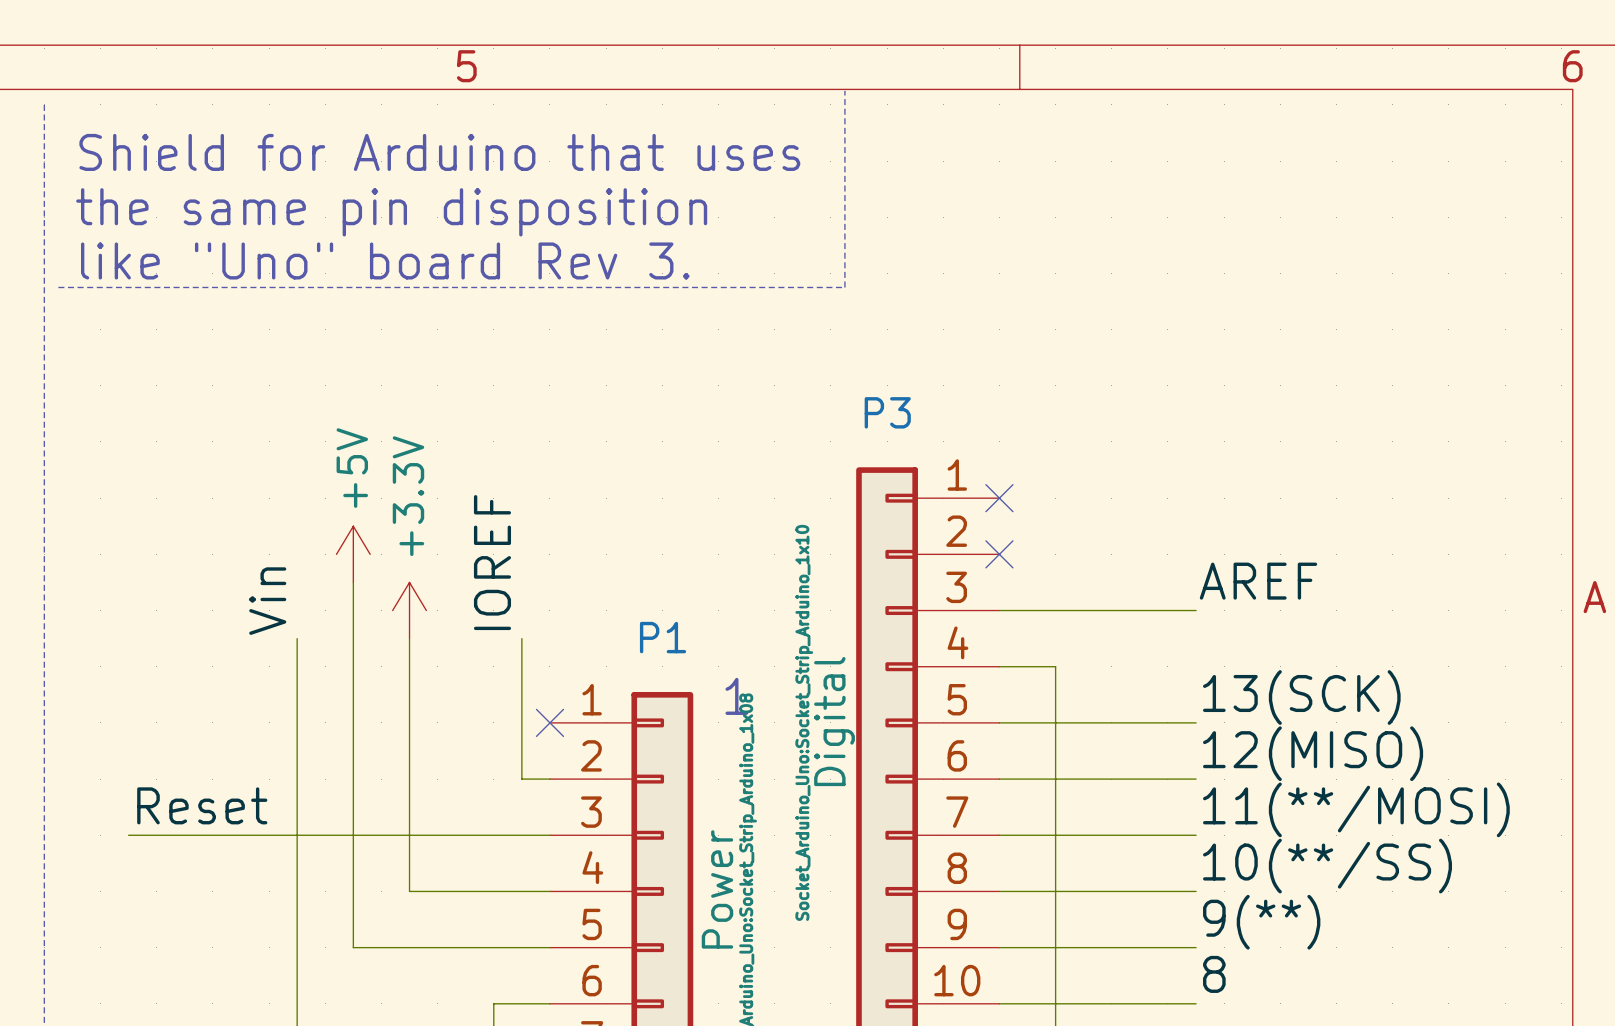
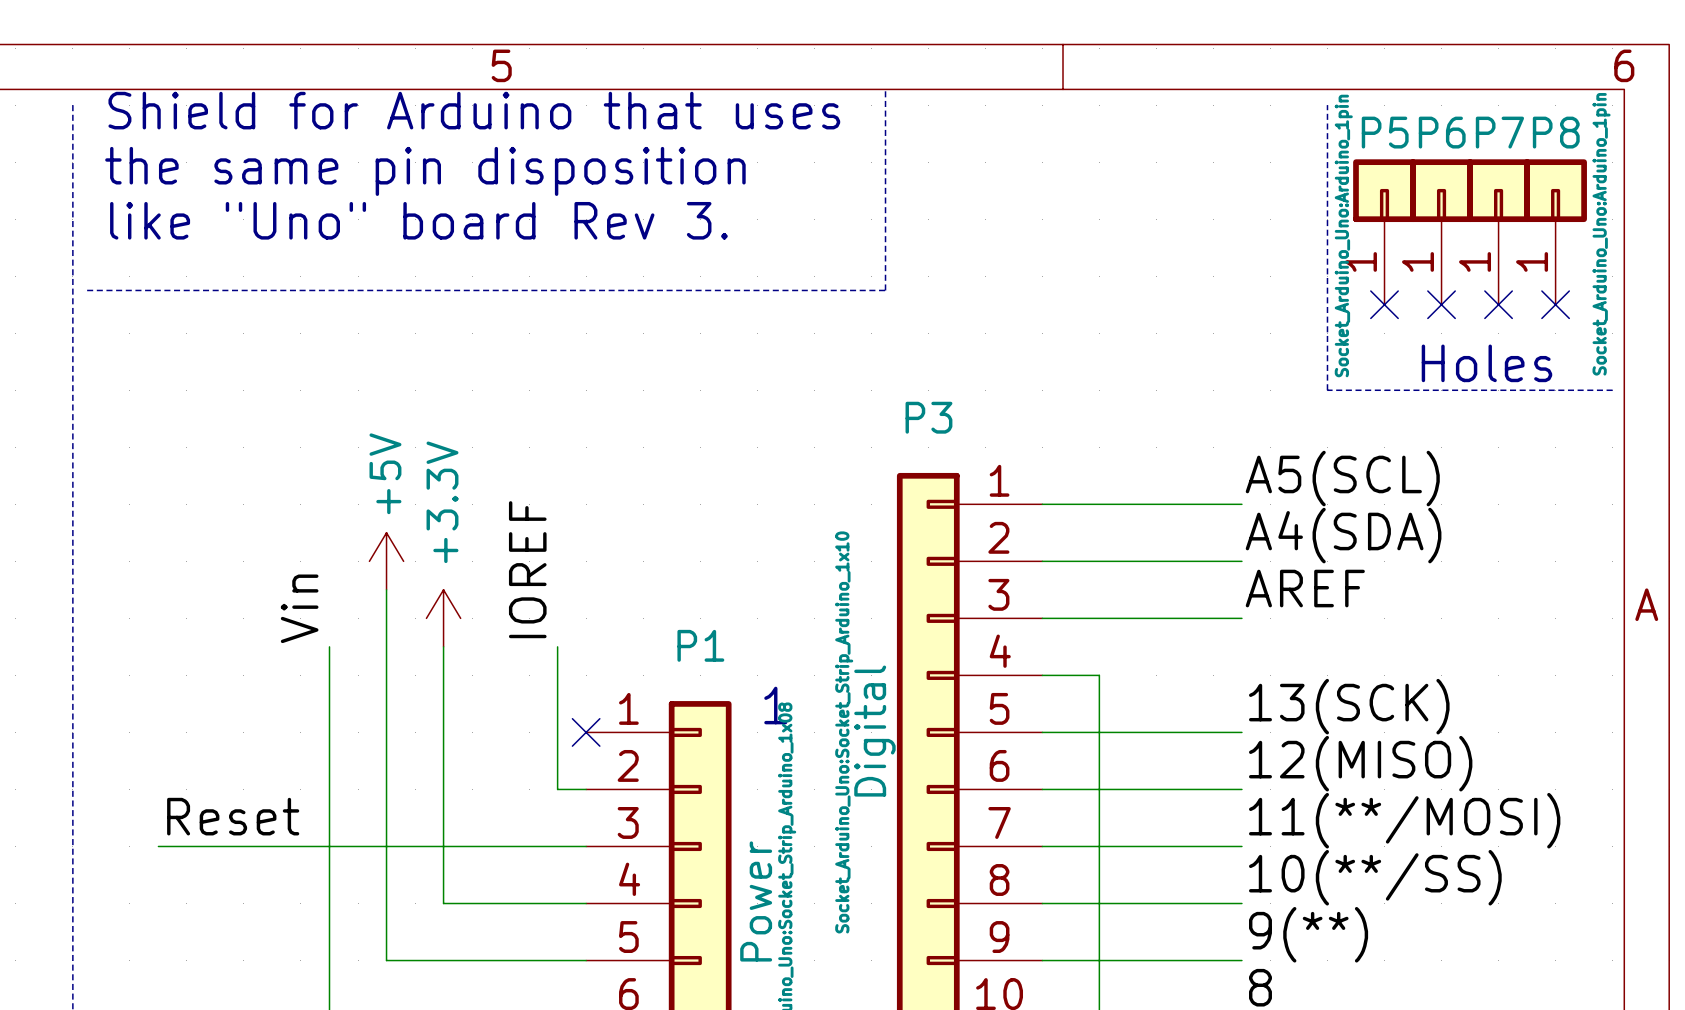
line: none -> (1327, 105) (1327, 390) (1612, 390)
text position: Shield for Arduino that uses (439, 152) -> Shield for Arduino that uses (474, 110)
text position: the same pin disposition (391, 212) -> the same pin disposition (425, 171)
P5: none -> (1384, 232)
P6: none -> (1441, 232)
P7: none -> (1498, 232)
P8: none -> (1555, 232)
text position: like "Uno" board Rev 3. (385, 260) -> like "Uno" board Rev 3. (418, 220)
no-connect mark: none -> (1384, 304)
no-connect mark: none -> (1441, 304)
no-connect mark: none -> (1498, 304)
no-connect mark: none -> (1555, 304)
text: none -> Holes (1486, 363)
label: none -> A5(SCL) (1342, 478)
wire: none -> (1042, 504) (1241, 504)
no-connect mark: (999, 498) -> none
label: none -> A4(SDA) (1343, 535)
wire: none -> (1042, 561) (1241, 561)
no-connect mark: (999, 554) -> none

